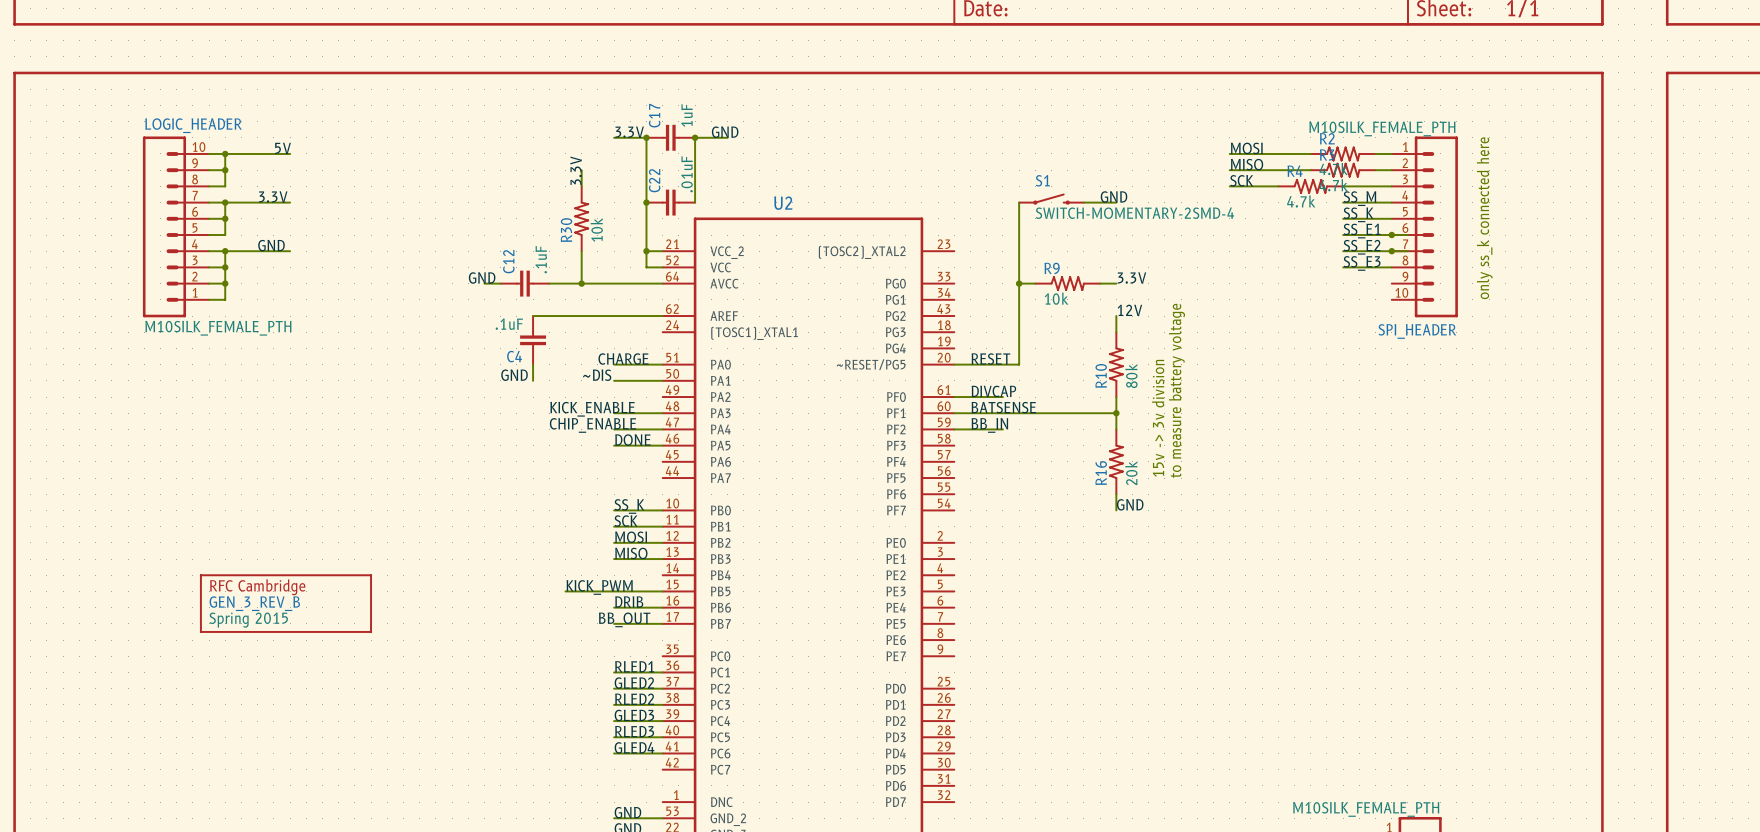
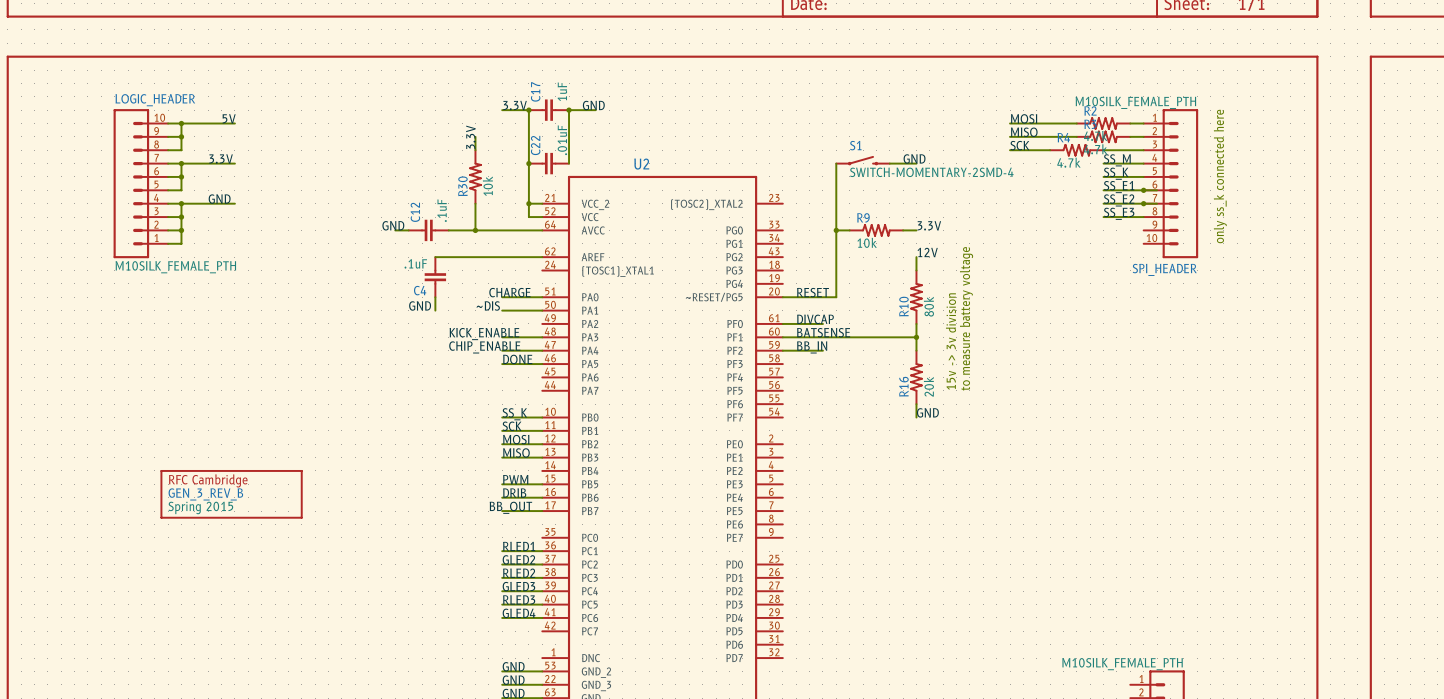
label: none -> PWM (515, 479)
label: KICK_PWM (599, 587) -> none
wire: (565, 591) (614, 591) -> none

